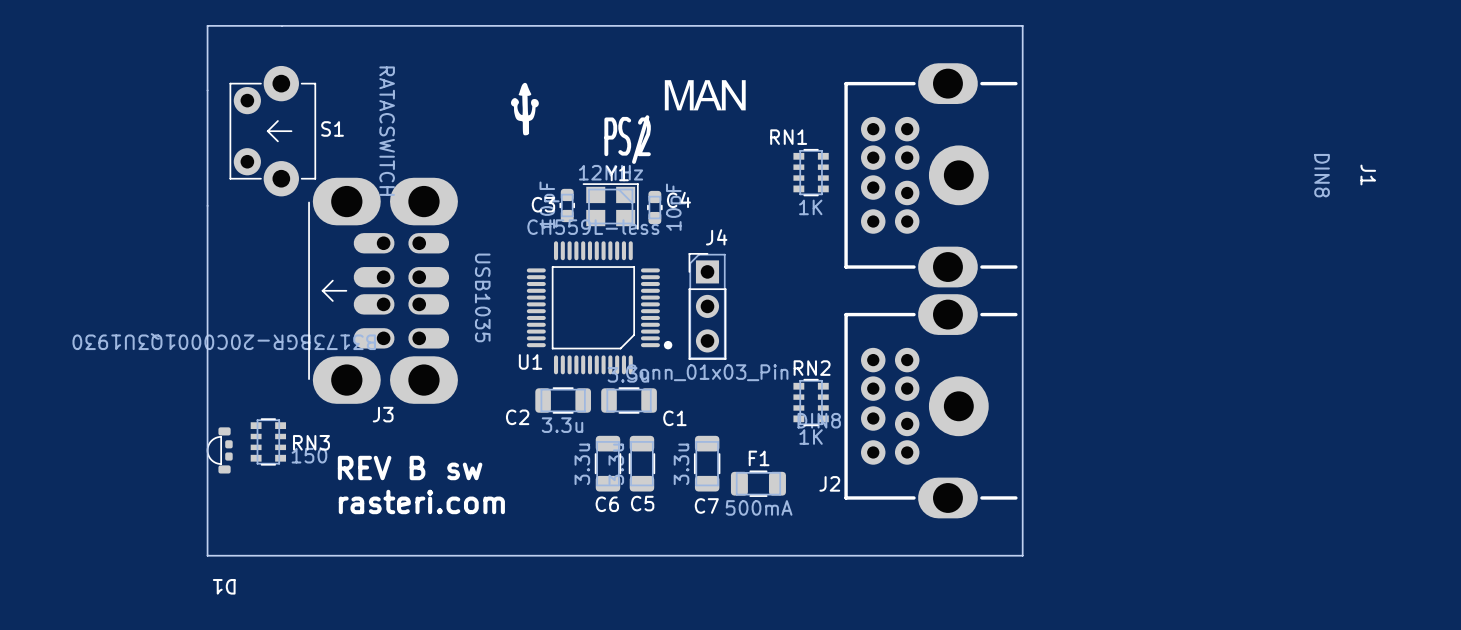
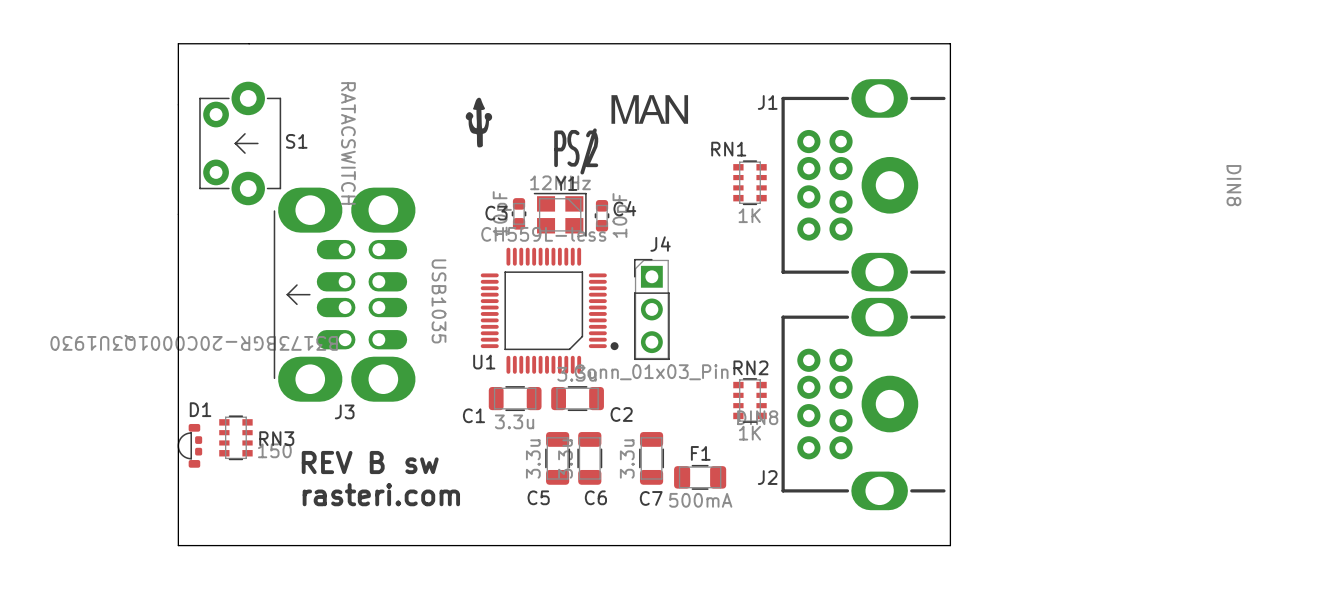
J1 name rotation: 0° (1368, 175) -> 90° counterclockwise (767, 102)
J1 name position: J1 (1368, 175) -> J1 (767, 102)
C2 name position: C2 (517, 417) -> C2 (621, 414)
C1 name position: C1 (674, 418) -> C1 (473, 415)
C5 name: C5 (642, 503) -> C6 (595, 497)
C6 name: C6 (607, 504) -> C5 (538, 497)
D1 name rotation: 0° (224, 586) -> 180° (200, 409)
D1 name position: D1 (224, 586) -> D1 (200, 409)

